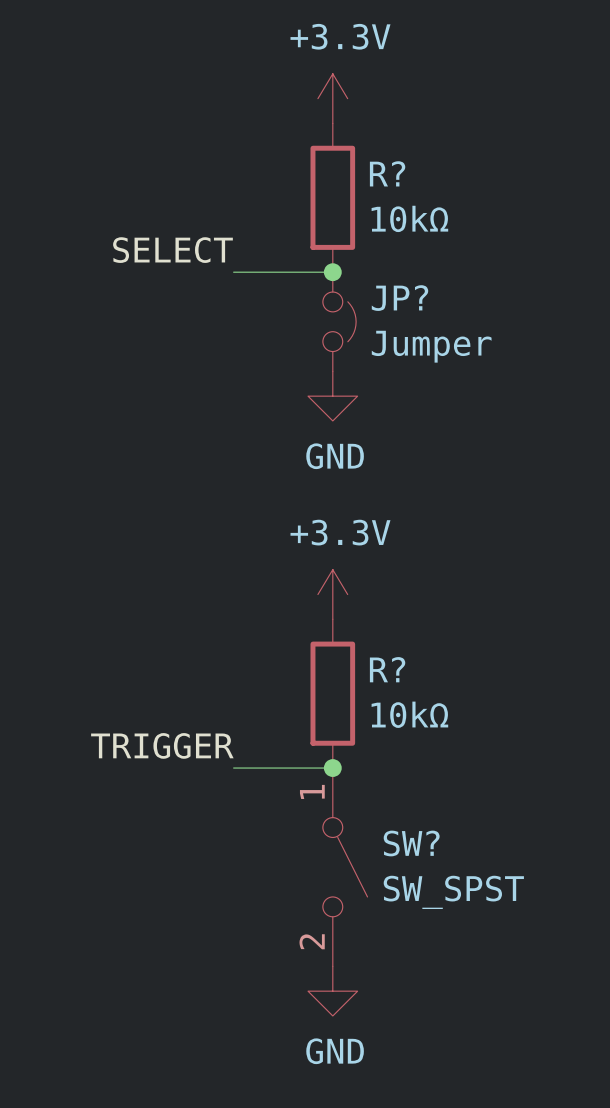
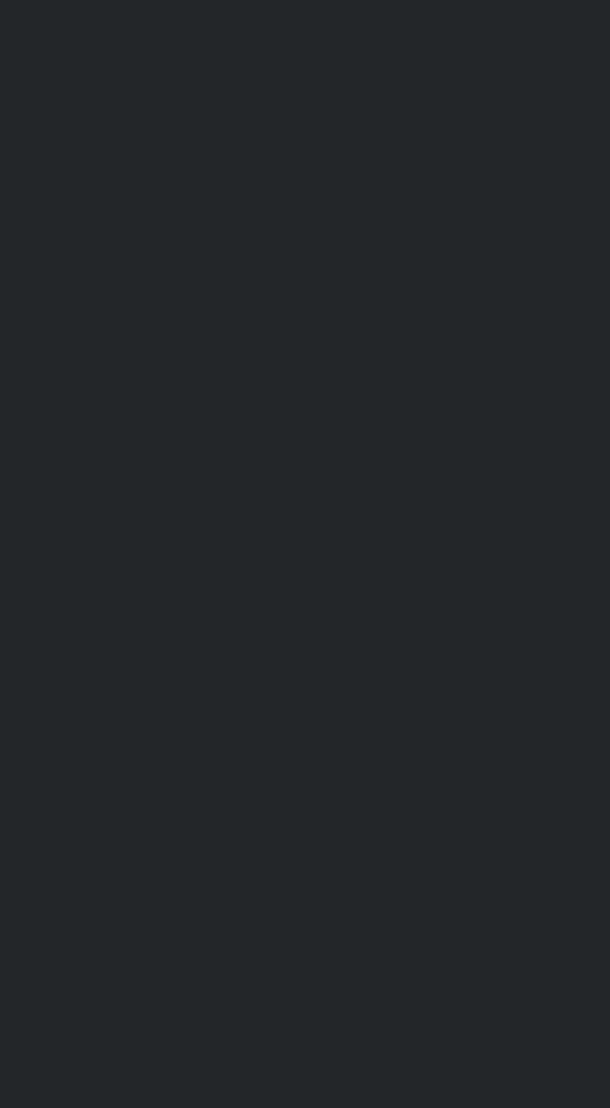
power symbol: +3.3V (332, 98) -> none
R?: 10kΩ (332, 197) -> none
label: SELECT (172, 250) -> none
wire: (233, 272) (332, 272) -> none
junction: (332, 272) -> none
JP?: Jumper (339, 321) -> none
power symbol: GND (332, 396) -> none
power symbol: +3.3V (332, 594) -> none
R?: 10kΩ (332, 693) -> none
label: TRIGGER (162, 745) -> none
wire: (233, 768) (332, 768) -> none
junction: (332, 768) -> none
SW?: SW_SPST (345, 867) -> none
power symbol: GND (332, 991) -> none

